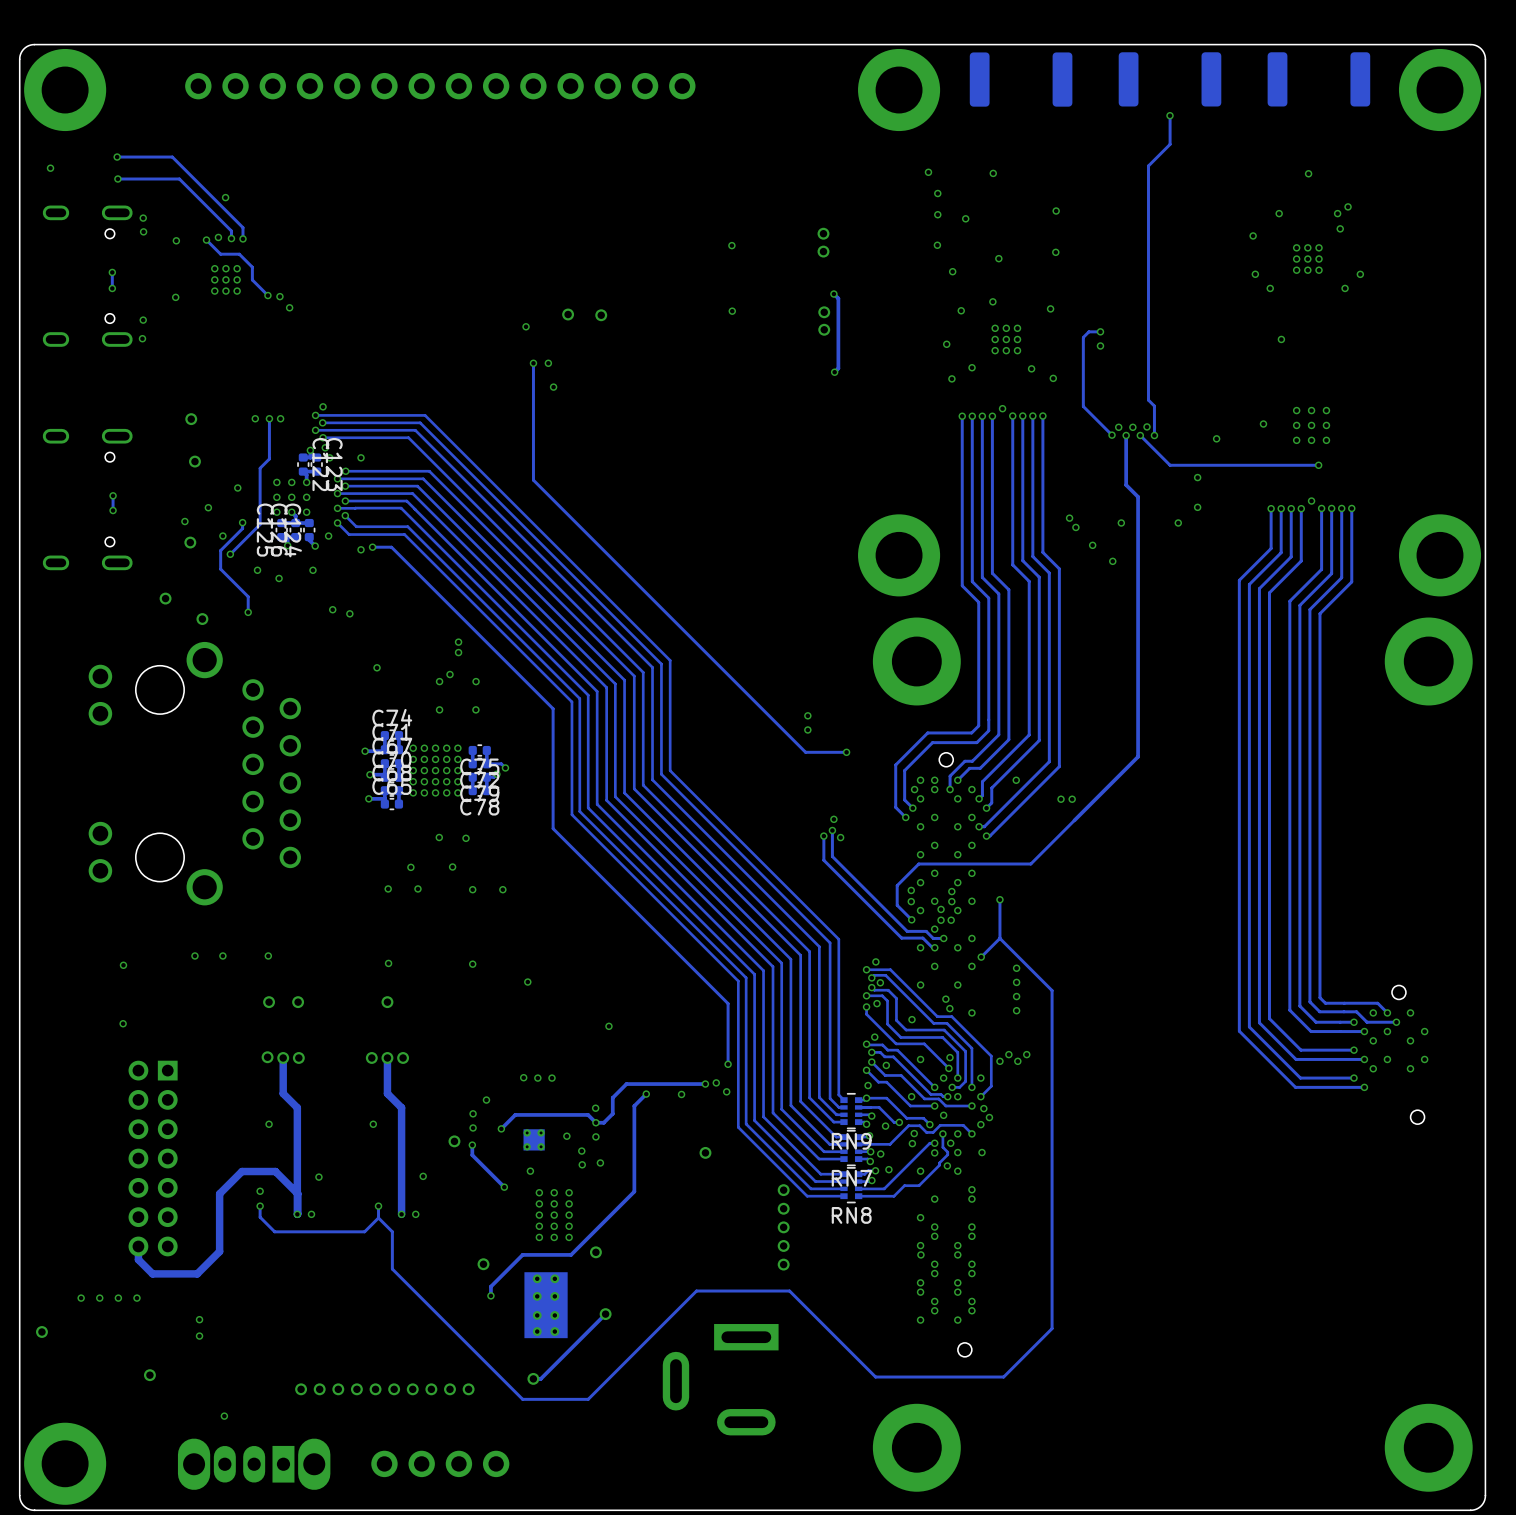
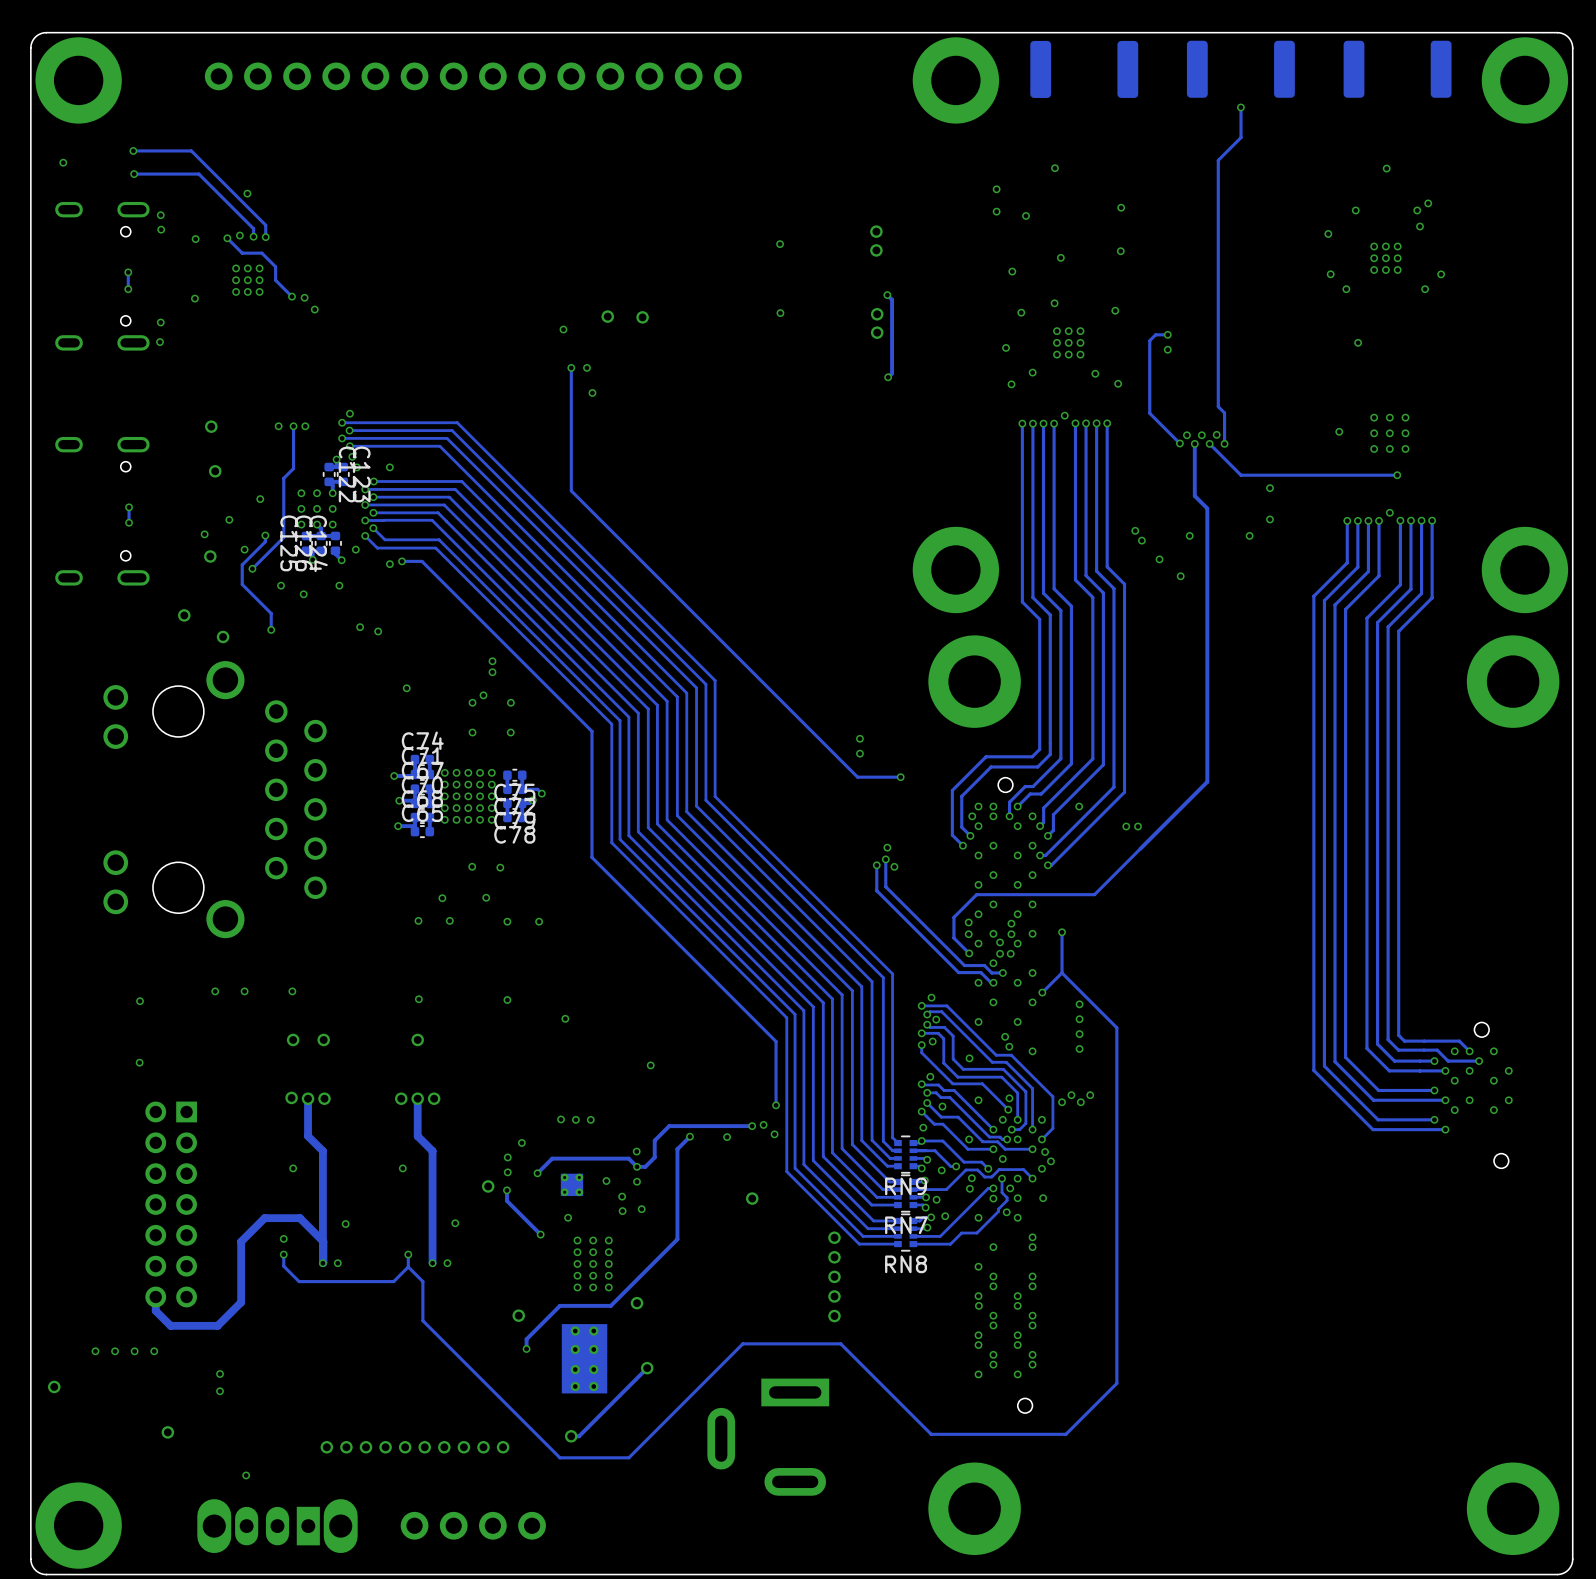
via: (928, 172) -> none
via: (937, 245) -> none
via: (1216, 438) -> none

